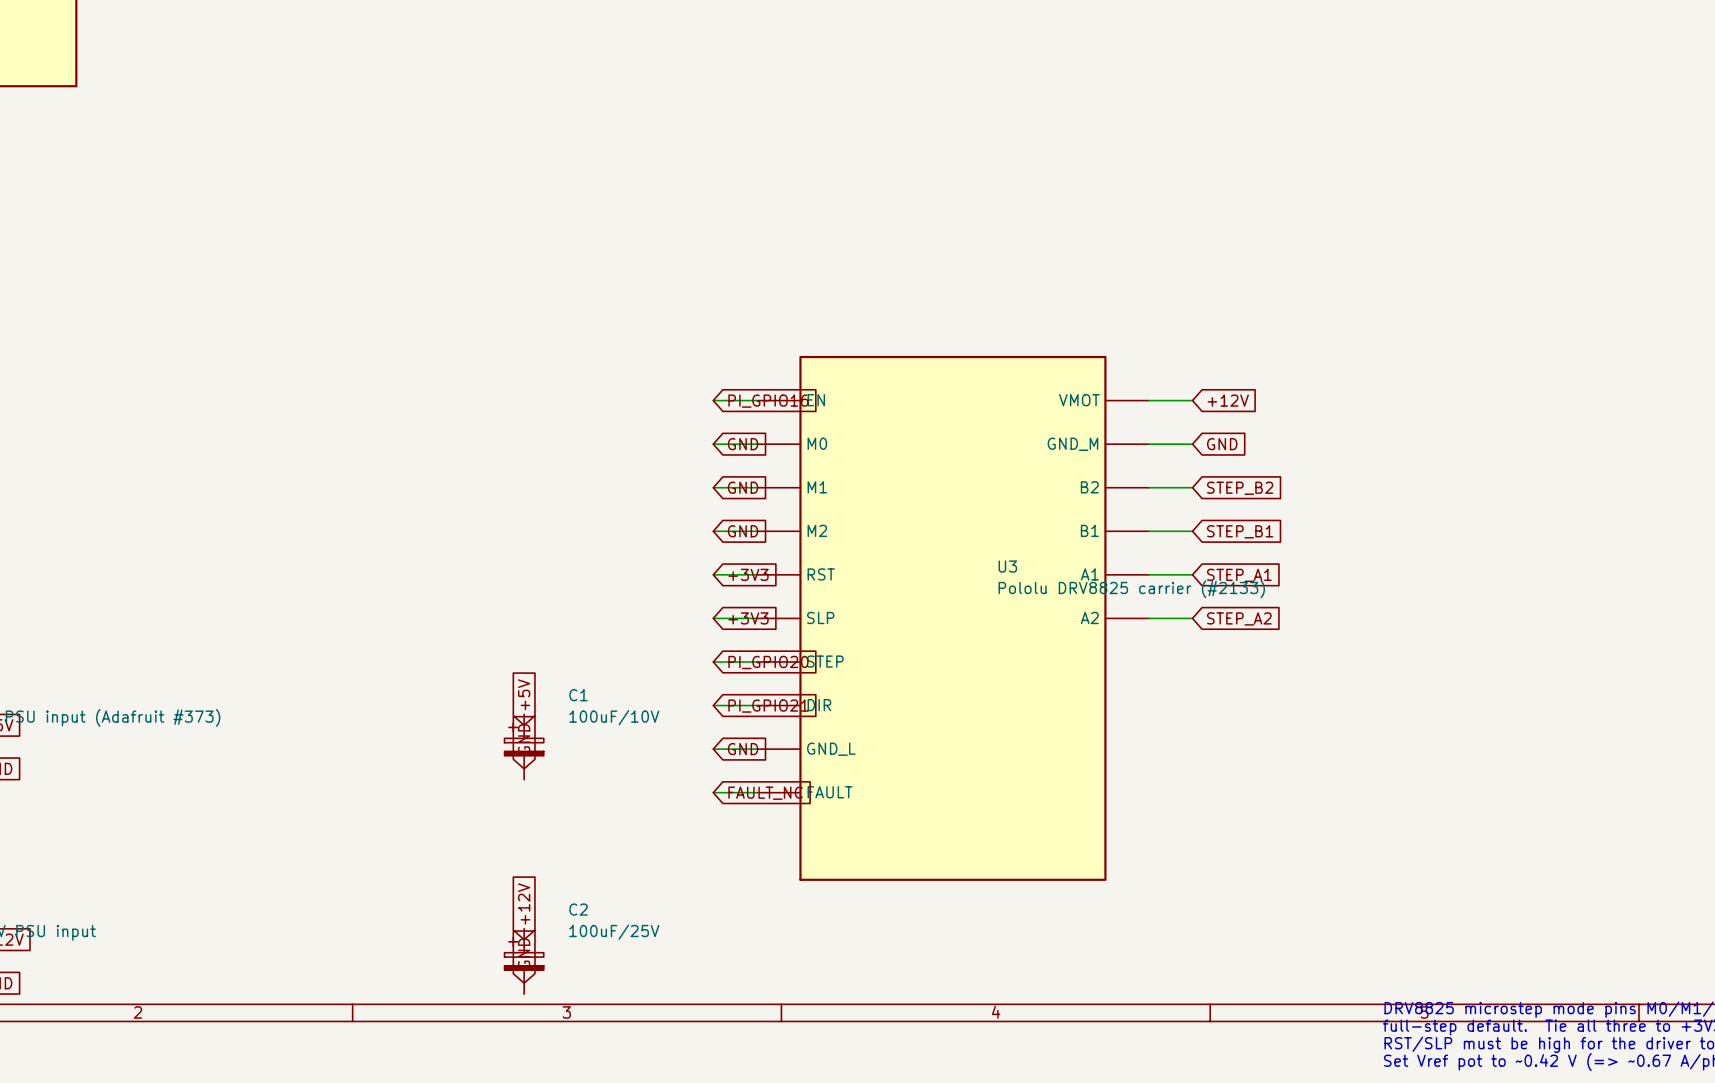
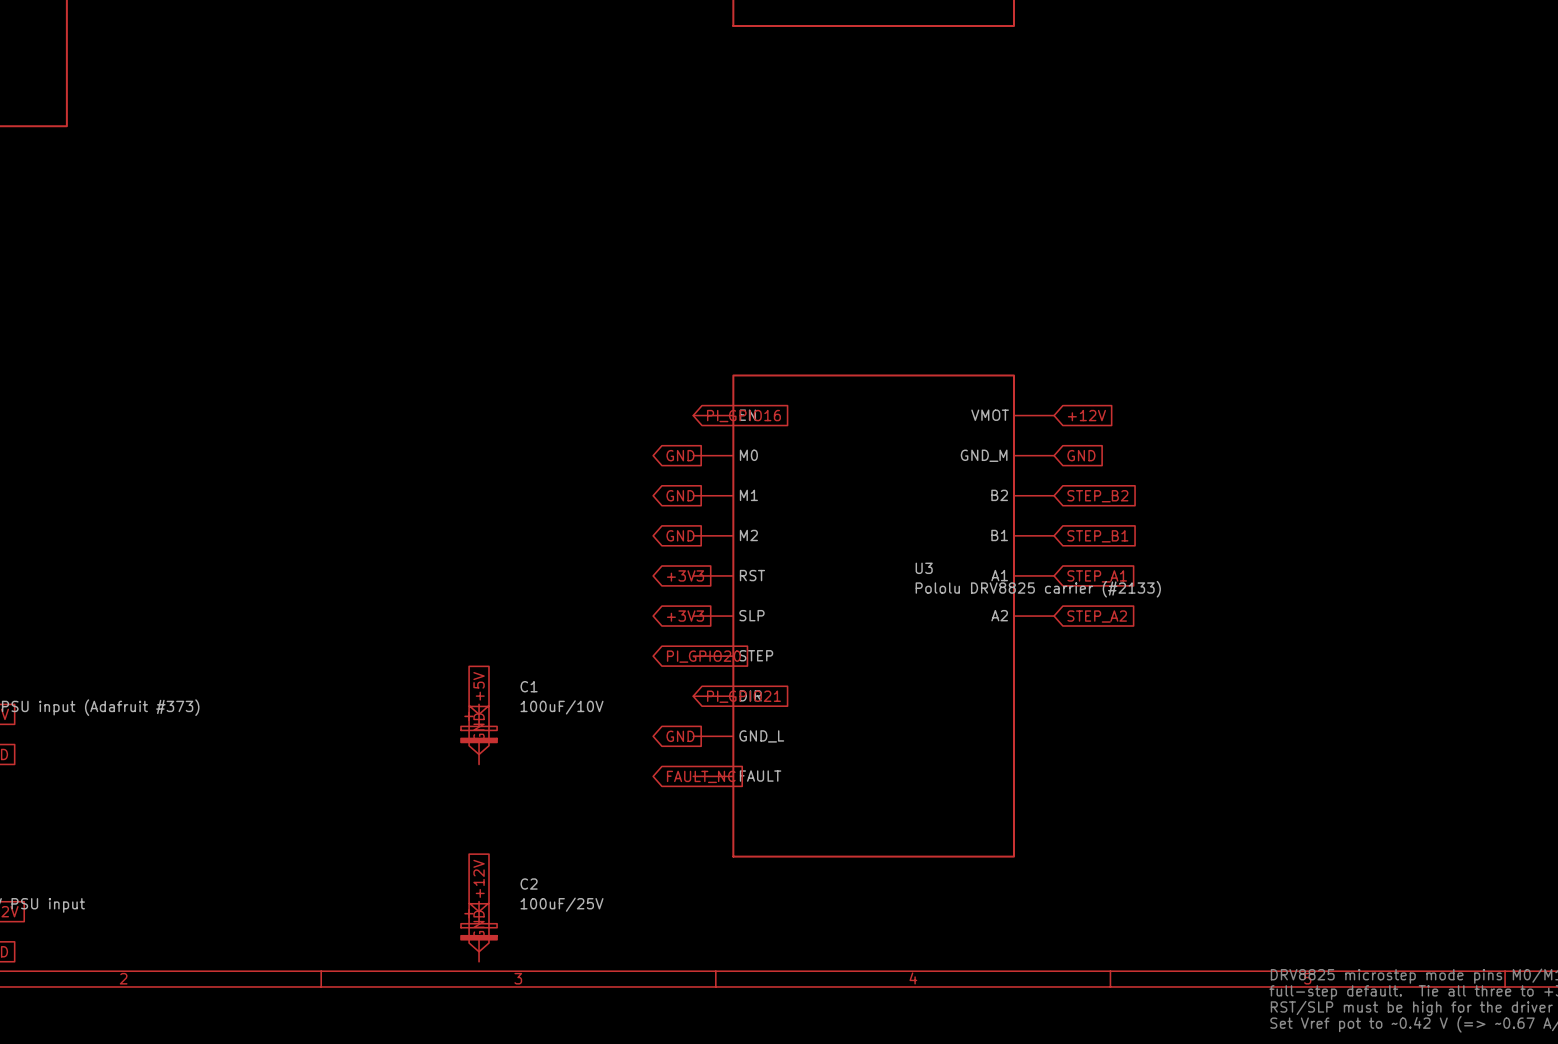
wire: (713, 400) (756, 400) -> none
wire: (1148, 400) (1192, 400) -> none
global label position: +12V (1228, 400) -> +12V (1086, 415)
global label position: PI_GPIO16 (768, 401) -> PI_GPIO16 (743, 416)
wire: (713, 444) (756, 444) -> none
wire: (1148, 444) (1192, 444) -> none
global label position: GND (1222, 444) -> GND (1081, 455)
wire: (713, 487) (756, 487) -> none
wire: (1148, 487) (1192, 487) -> none
global label position: STEP_B2 (1240, 488) -> STEP_B2 (1097, 496)
wire: (713, 531) (756, 531) -> none
wire: (1148, 531) (1192, 531) -> none
global label position: STEP_B1 (1240, 531) -> STEP_B1 (1097, 536)
wire: (713, 574) (756, 574) -> none
wire: (1148, 574) (1192, 574) -> none
global label position: STEP_A1 (1239, 575) -> STEP_A1 (1097, 576)
wire: (713, 618) (756, 618) -> none
wire: (1148, 618) (1192, 618) -> none
global label position: STEP_A2 (1239, 618) -> STEP_A2 (1097, 616)
wire: (713, 661) (756, 661) -> none
wire: (713, 705) (756, 705) -> none
global label position: PI_GPIO21 (768, 706) -> PI_GPIO21 (743, 696)
wire: (713, 749) (756, 749) -> none
wire: (713, 792) (756, 792) -> none

